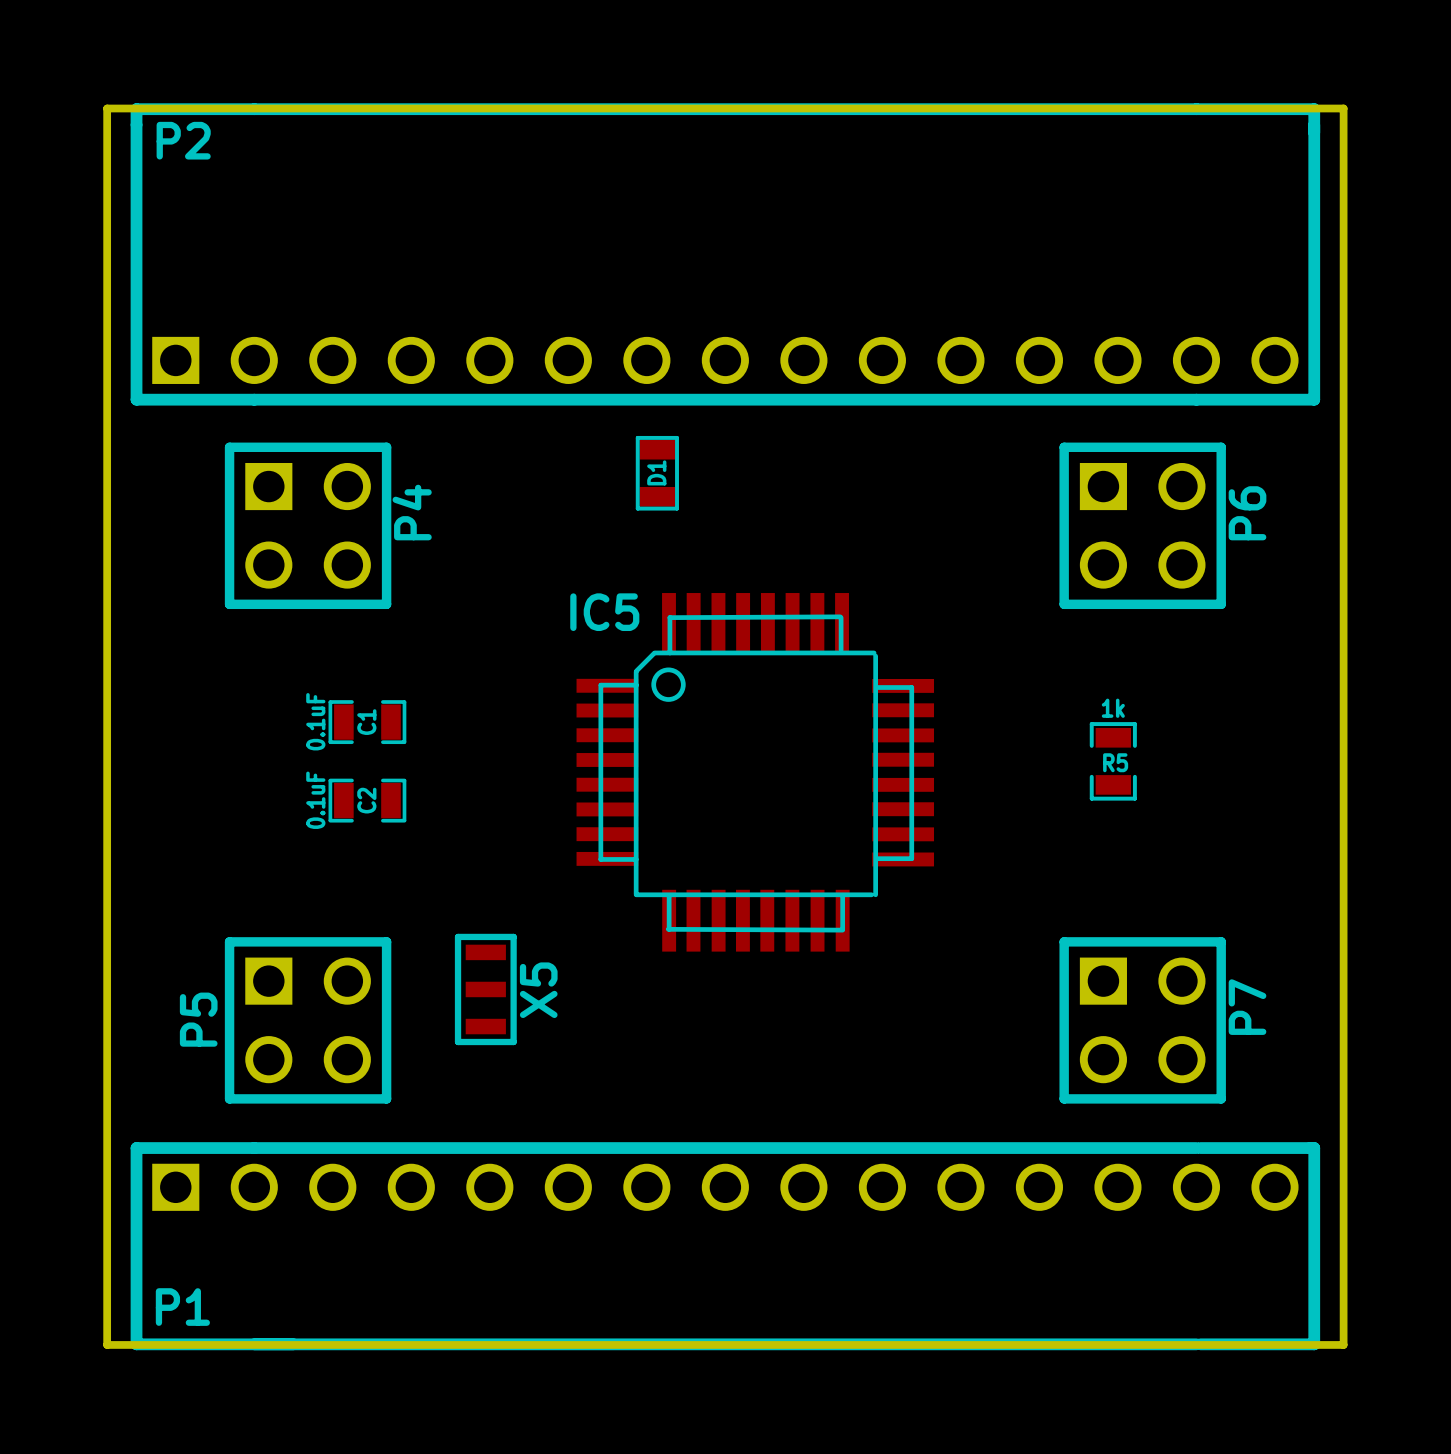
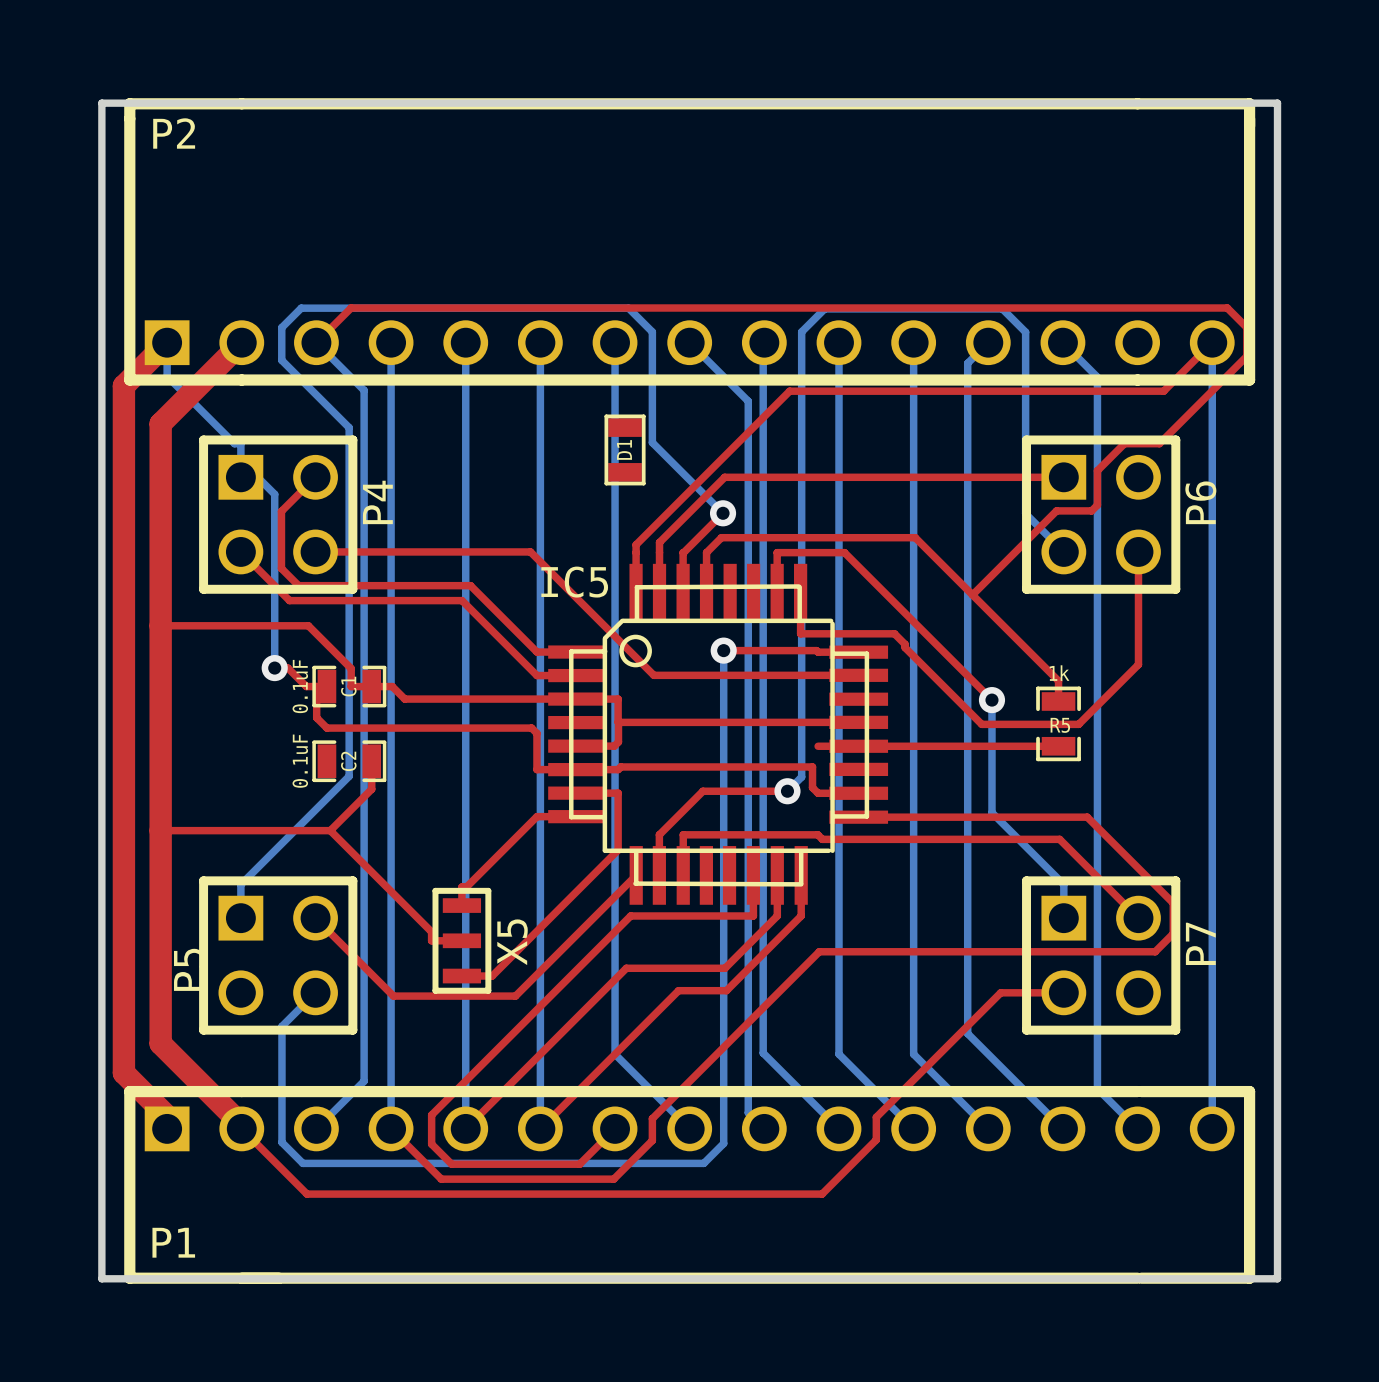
top track: none -> (167, 342) (123, 385) (123, 1073) (167, 1116) (167, 1128)
bottom track: none -> (167, 342) (167, 376) (234, 443) (240, 443) (240, 477)
top track: none -> (241, 342) (160, 423) (160, 1043) (241, 1124) (241, 1128) (306, 1194) (822, 1194) (876, 1139) (876, 1117) (1000, 992) (1063, 992)
top track: none -> (316, 342) (351, 308) (1227, 308) (1246, 327) (1246, 356) (1159, 443) (1124, 443) (1097, 470) (1097, 505) (1091, 510) (1056, 510) (972, 594)
bottom track: none -> (316, 342) (364, 390) (364, 1081) (316, 1128)
bottom track: none -> (391, 342) (391, 1128)
bottom track: none -> (465, 342) (465, 1128)
bottom track: none -> (540, 342) (540, 1128)
bottom track: none -> (615, 342) (615, 1054) (689, 1128)
bottom track: none -> (689, 342) (748, 401) (748, 1112) (764, 1128)
bottom track: none -> (764, 342) (763, 1053) (839, 1128)
bottom track: none -> (839, 342) (839, 1054) (913, 1128)
bottom track: none -> (913, 342) (913, 1054) (988, 1128)
bottom track: none -> (988, 342) (967, 363) (967, 1033) (1062, 1128)
bottom track: none -> (1062, 342) (1097, 377) (1097, 1088) (1137, 1128)
top track: none -> (1212, 342) (1163, 391) (789, 391) (636, 544) (636, 593)
bottom track: none -> (1212, 342) (1212, 1128)
bottom track: none -> (240, 460) (274, 494) (274, 668)
top track: none -> (315, 477) (281, 511) (281, 568) (298, 585) (470, 585) (536, 652) (577, 652)
top track: none -> (1063, 477) (724, 477) (659, 542) (659, 593)
P4 position: (308, 525) -> (278, 514)
P6 position: (1142, 525) -> (1101, 514)
top track: none -> (723, 513) (683, 552) (683, 593)
bottom track: none -> (723, 513) (652, 442) (652, 331) (628, 308) (301, 308) (281, 327) (281, 360) (349, 427) (349, 776) (240, 884) (240, 918)
via: none -> (723, 513)
top track: none -> (240, 551) (289, 600) (462, 600) (536, 675) (577, 675)
top track: none -> (315, 551) (530, 551) (653, 675) (858, 675)
bottom track: none -> (1063, 551) (1025, 513) (1025, 332) (1002, 308) (824, 308) (801, 331) (801, 777) (787, 791)
top track: none -> (1138, 551) (1138, 664) (1078, 724) (981, 724) (905, 647) (905, 644) (894, 633) (800, 633) (800, 593)
top track: none -> (706, 593) (706, 552) (721, 537) (915, 537) (1058, 680) (1058, 701)
top track: none -> (777, 593) (777, 552) (844, 552) (991, 700)
top track: none -> (160, 625) (308, 625) (351, 668) (351, 686) (392, 686) (404, 699) (618, 699) (618, 722)
top track: none -> (723, 650) (858, 652)
bottom track: none -> (723, 650) (723, 1143) (703, 1163) (302, 1163) (281, 1142) (281, 1026) (315, 992)
via: none -> (723, 650)
top track: none -> (274, 668) (287, 668) (306, 686) (326, 686)
via: none -> (274, 668)
top track: none -> (316, 686) (316, 717) (326, 728) (531, 728) (536, 733) (536, 769) (618, 769) (620, 766) (812, 766) (812, 787) (818, 793) (858, 793)
bottom track: none -> (991, 700) (991, 812) (1063, 884) (1063, 918)
via: none -> (991, 700)
top track: none -> (858, 722) (618, 722) (618, 742) (614, 746) (577, 746)
top track: none -> (818, 746) (1058, 746)
top track: none -> (371, 761) (371, 789) (330, 830)
top track: none -> (787, 791) (702, 791) (659, 834) (659, 875)
via: none -> (787, 791)
top track: none -> (577, 793) (618, 793) (618, 850) (492, 976) (461, 976)
top track: none -> (577, 816) (536, 816) (466, 887) (461, 887) (461, 905)
top track: none -> (858, 817) (1087, 817) (1173, 903) (1173, 933) (1155, 951) (819, 951) (652, 1118) (652, 1140) (613, 1179) (441, 1179) (391, 1128)
top track: none -> (160, 830) (330, 830)
top track: none -> (330, 830) (431, 931) (431, 940) (461, 940)
top track: none -> (636, 875) (515, 996) (393, 996) (315, 918)
top track: none -> (683, 875) (683, 834) (817, 834) (822, 839) (1059, 839) (1138, 918)
top track: none -> (753, 875) (753, 915) (630, 915) (431, 1115) (431, 1144) (451, 1164) (579, 1164) (615, 1128)
top track: none -> (777, 875) (777, 915) (725, 968) (626, 968) (465, 1128)
top track: none -> (801, 875) (801, 915) (726, 990) (678, 990) (540, 1128)
P5 position: (308, 1020) -> (278, 955)
P7 position: (1142, 1020) -> (1101, 955)

